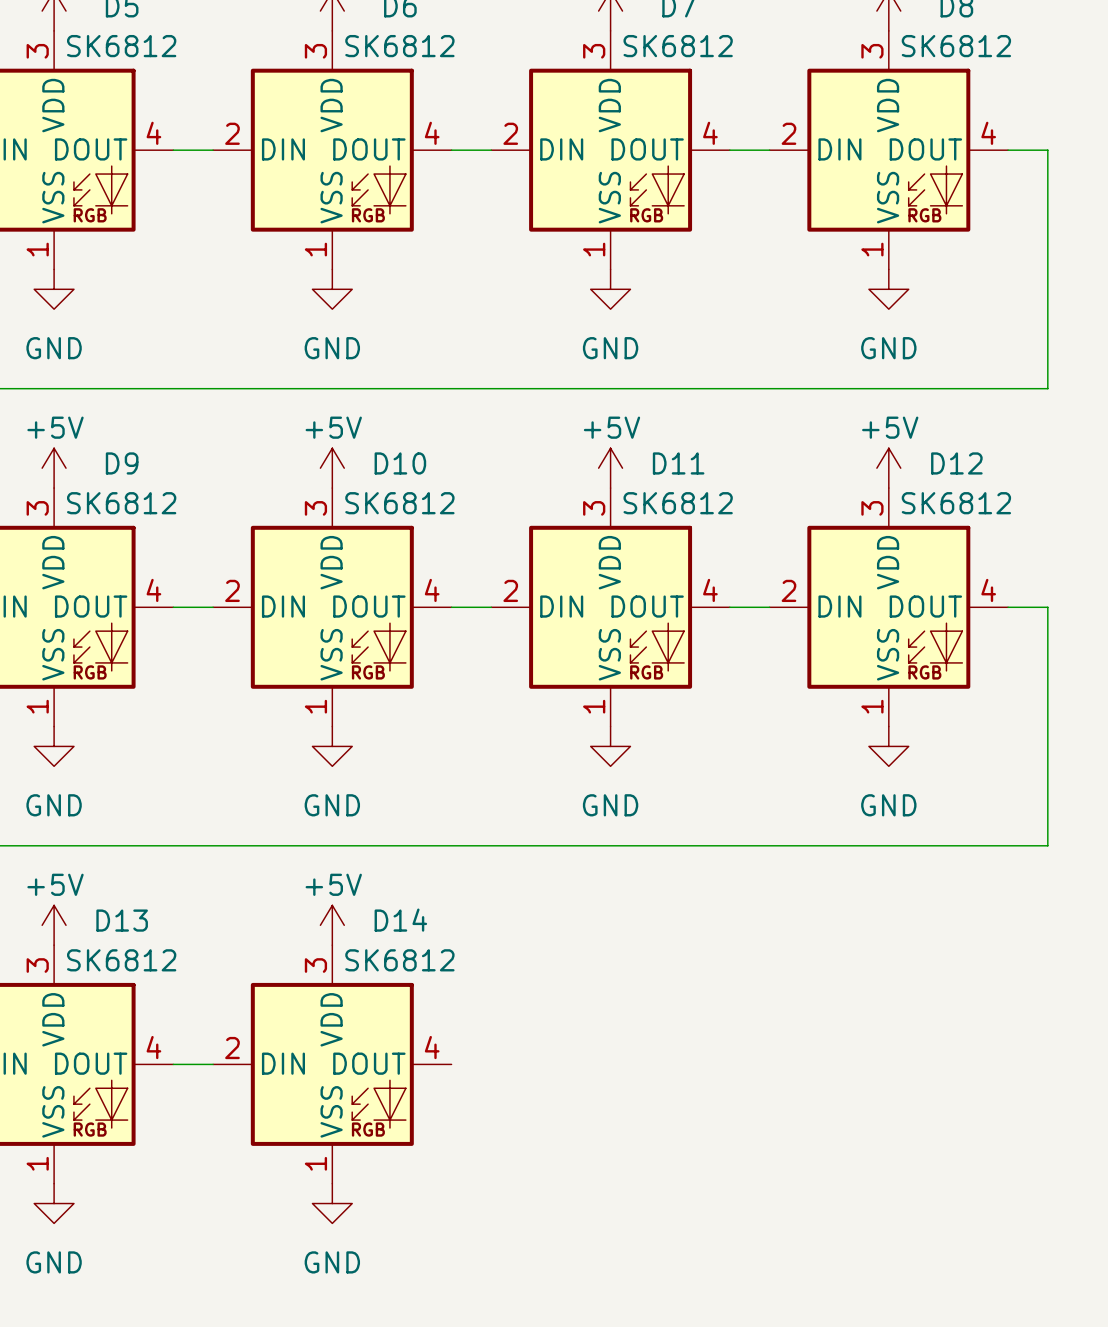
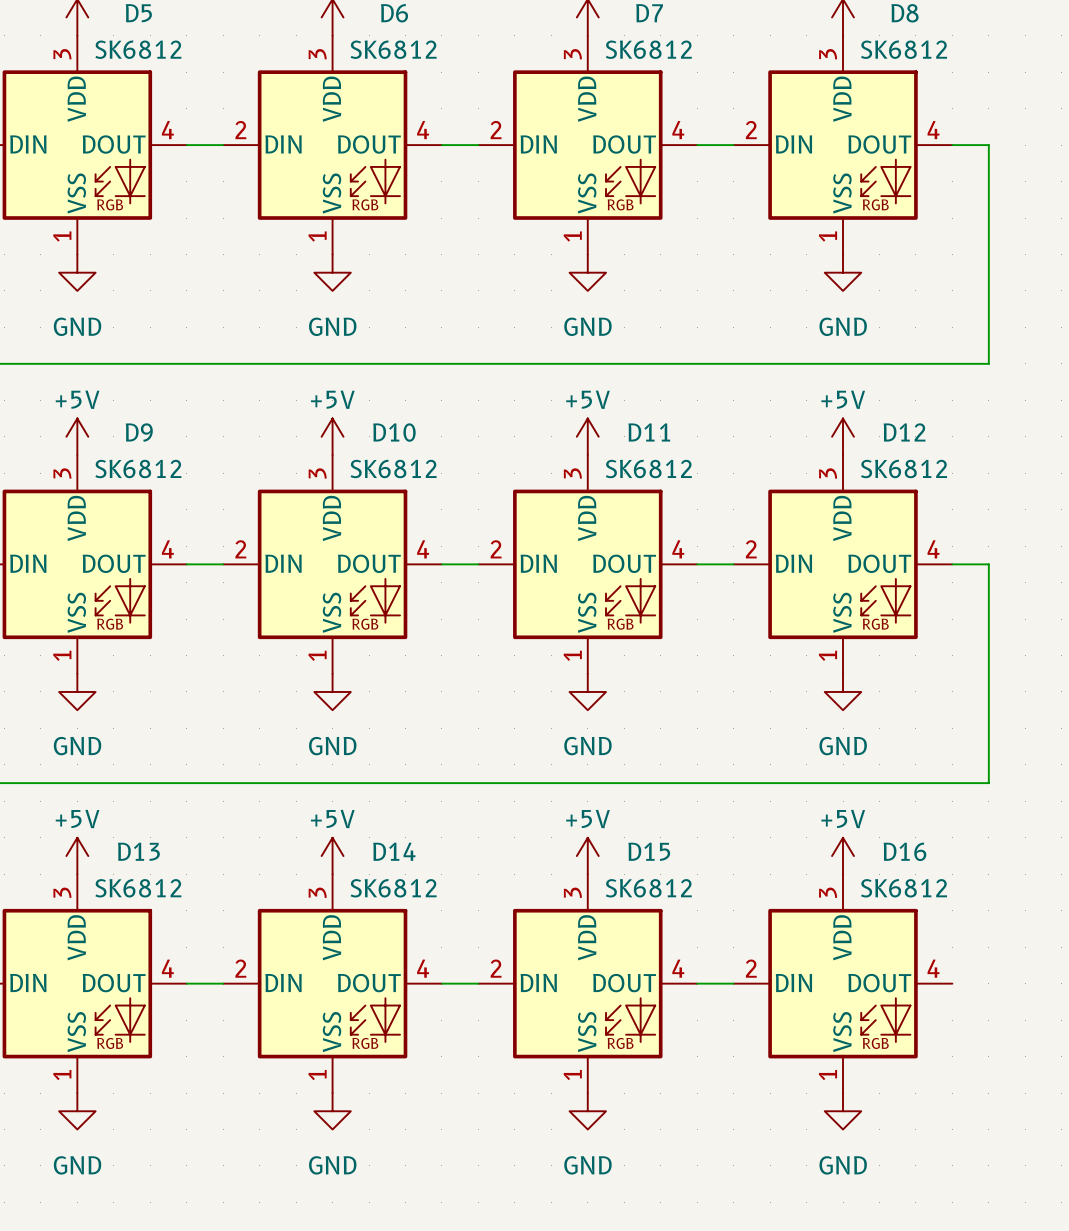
power symbol: none -> +5V (587, 856)
power symbol: none -> +5V (843, 856)
wire: none -> (441, 983) (478, 983)
D15: none -> SK6812 (587, 983)
wire: none -> (697, 983) (733, 983)
D16: none -> SK6812 (843, 983)
power symbol: none -> GND (587, 1111)
power symbol: none -> GND (843, 1111)

